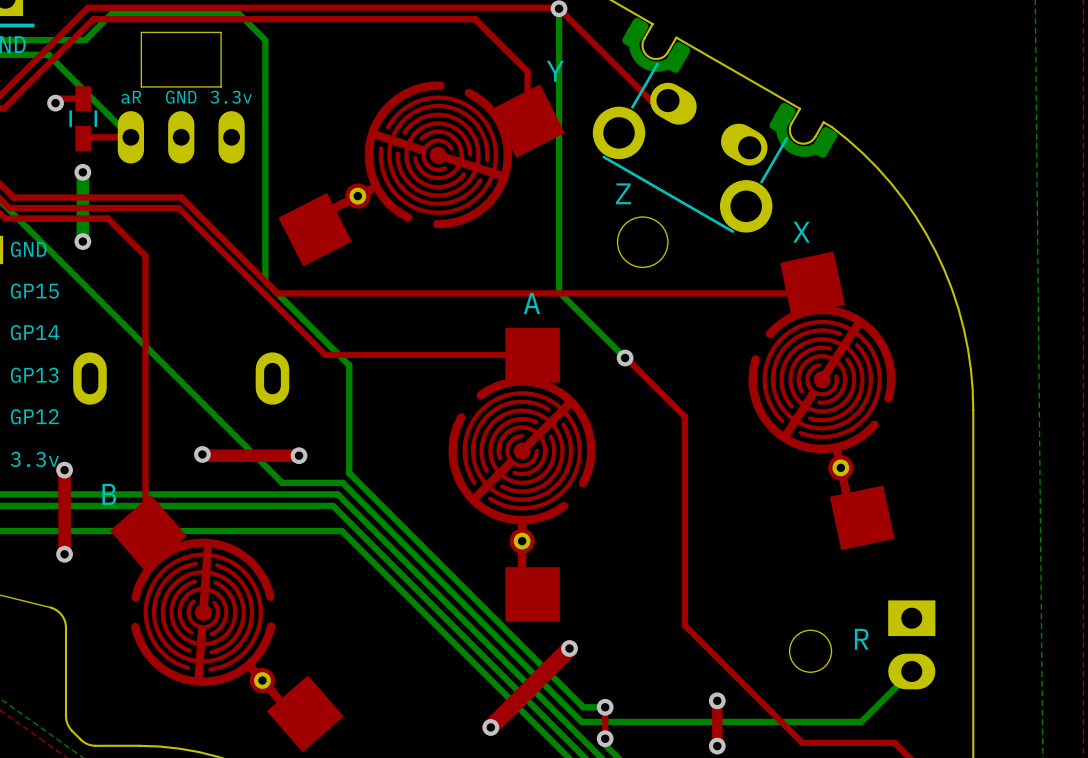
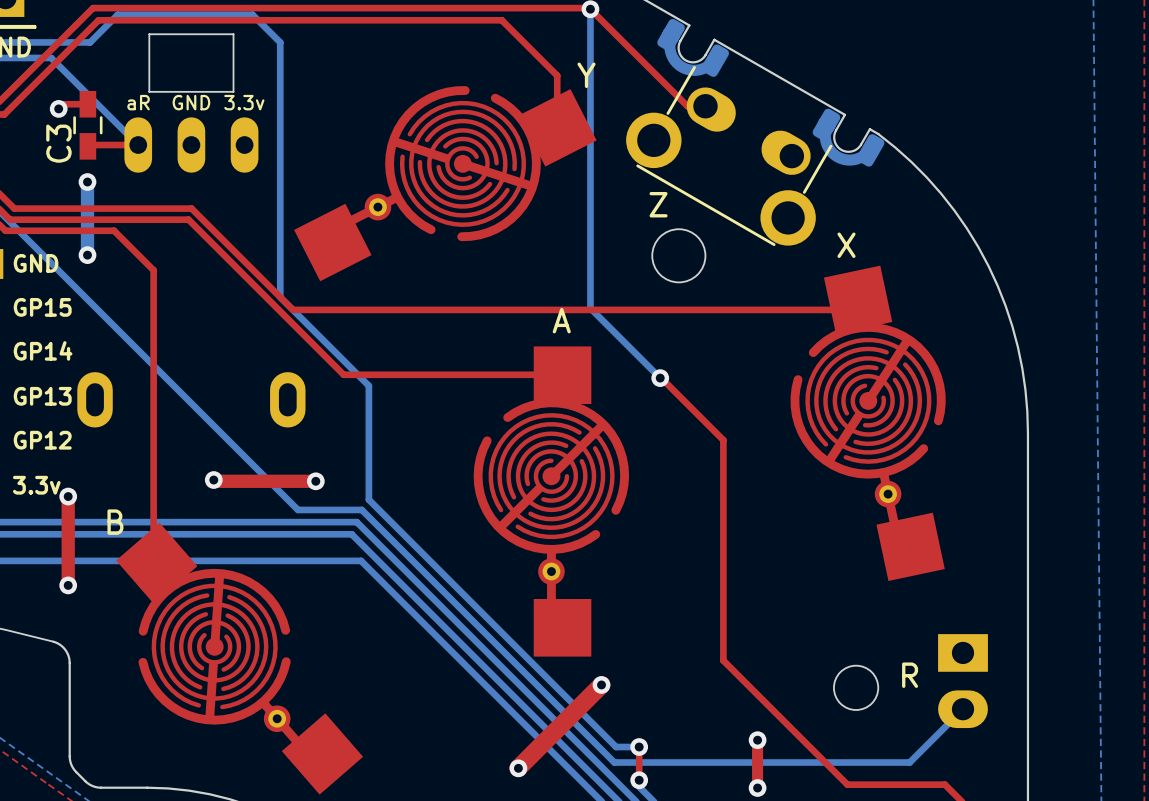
C3 name: none -> C3 (58, 143)

